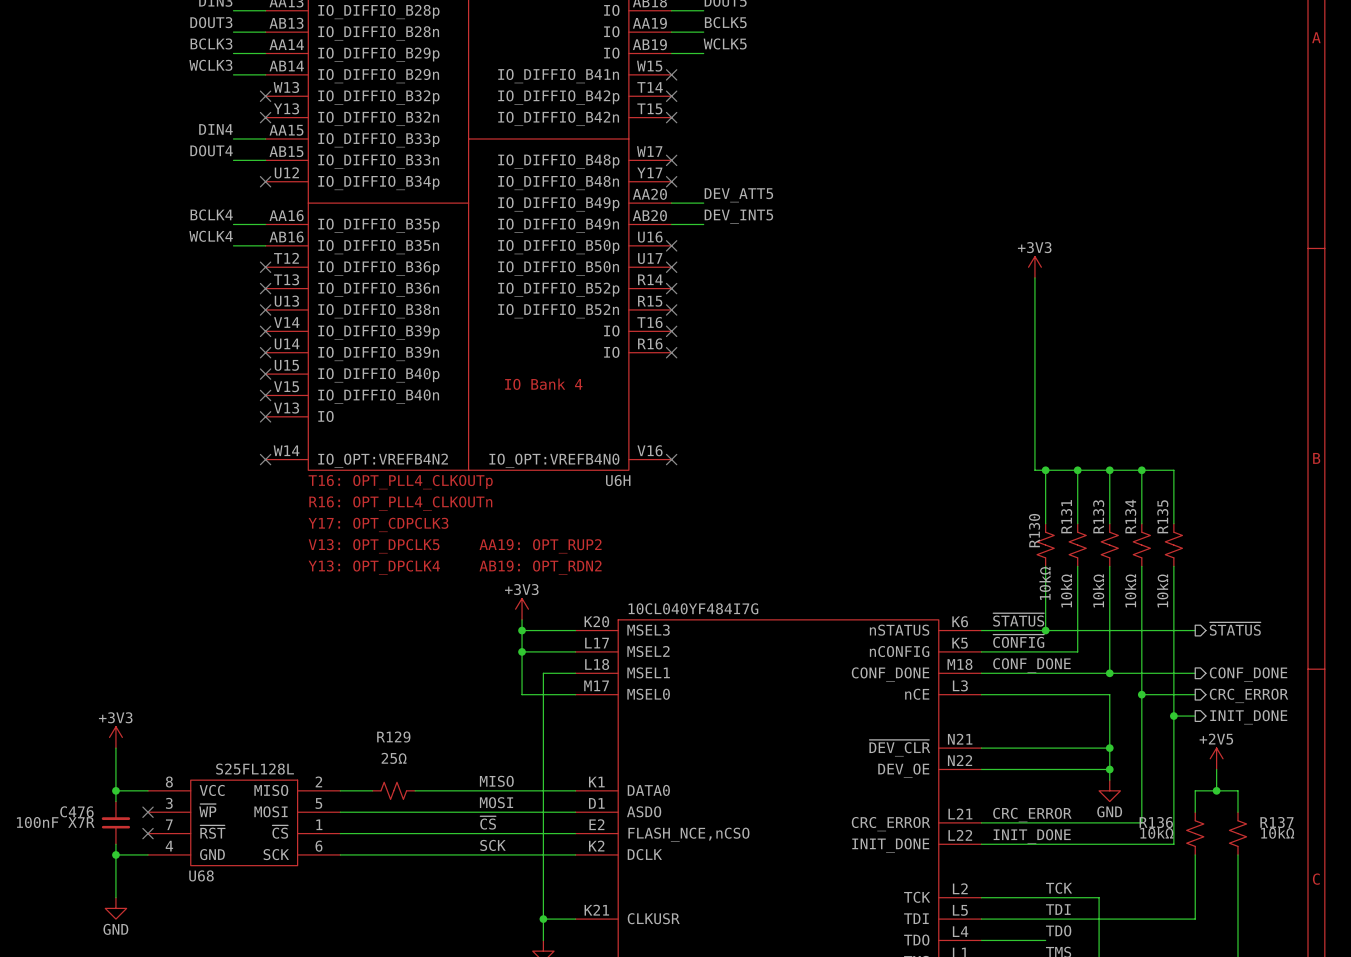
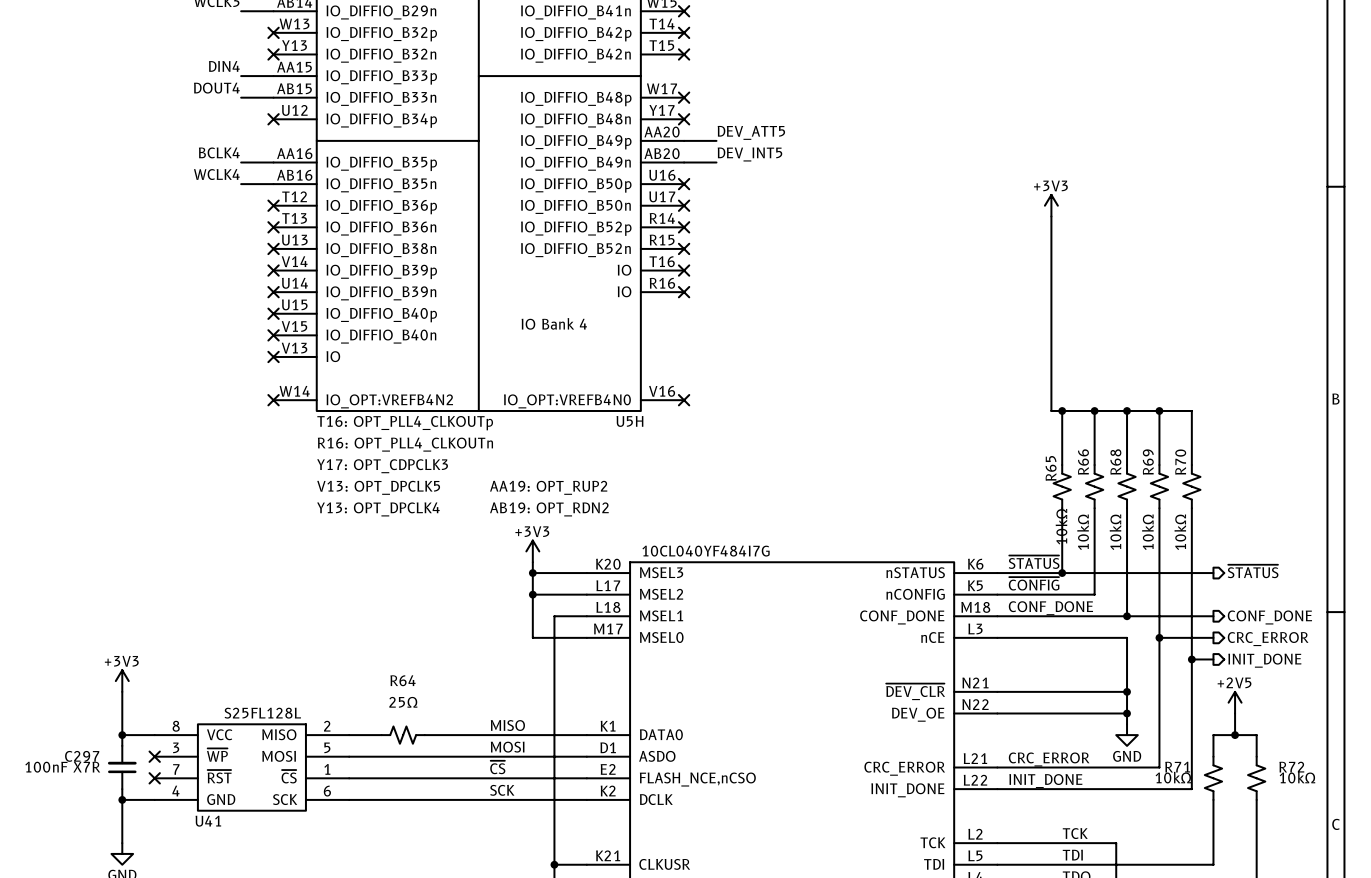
U6H name: U6H (618, 480) -> U5H (629, 421)
R131 name: R131 (1066, 516) -> R66 (1083, 462)
R133 name: R133 (1098, 516) -> R68 (1115, 461)
R134 name: R134 (1130, 516) -> R69 (1148, 462)
R135 name: R135 (1162, 516) -> R70 (1180, 462)
R130 name: R130 (1034, 530) -> R65 (1051, 468)
R129 name: R129 (393, 737) -> R64 (403, 680)
C476 name: C476 (76, 811) -> C297 (82, 756)
R136 name: R136 (1156, 822) -> R71 (1177, 767)
R137 name: R137 (1276, 822) -> R72 (1291, 767)
U68 name: U68 (201, 875) -> U41 (208, 821)

